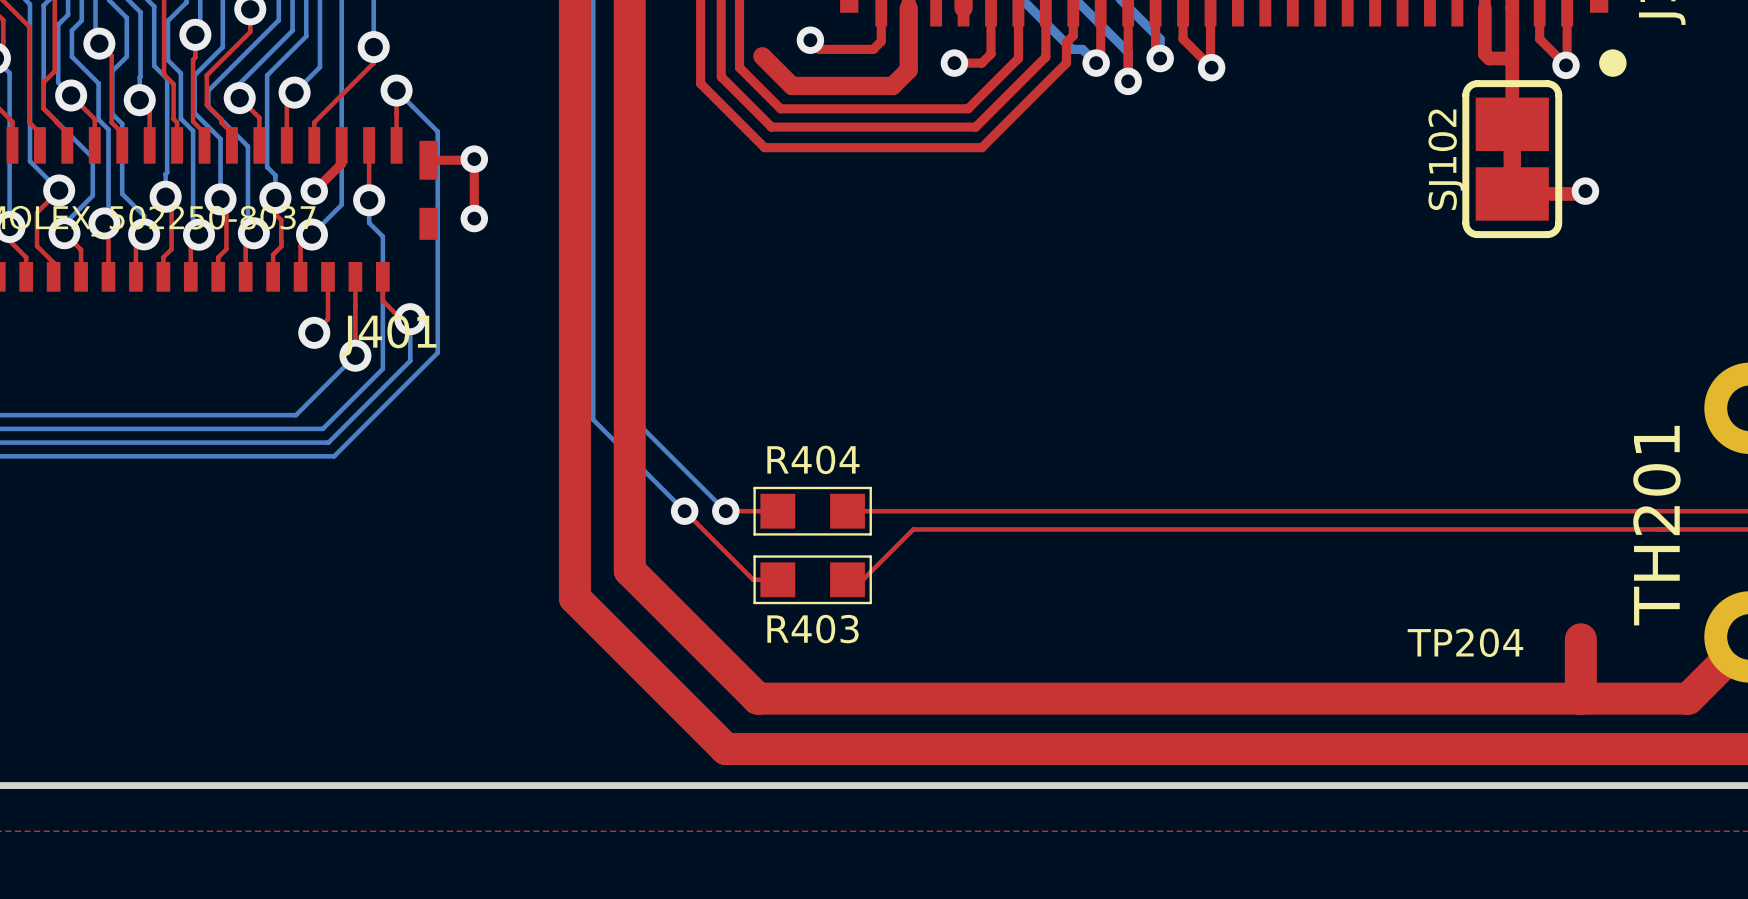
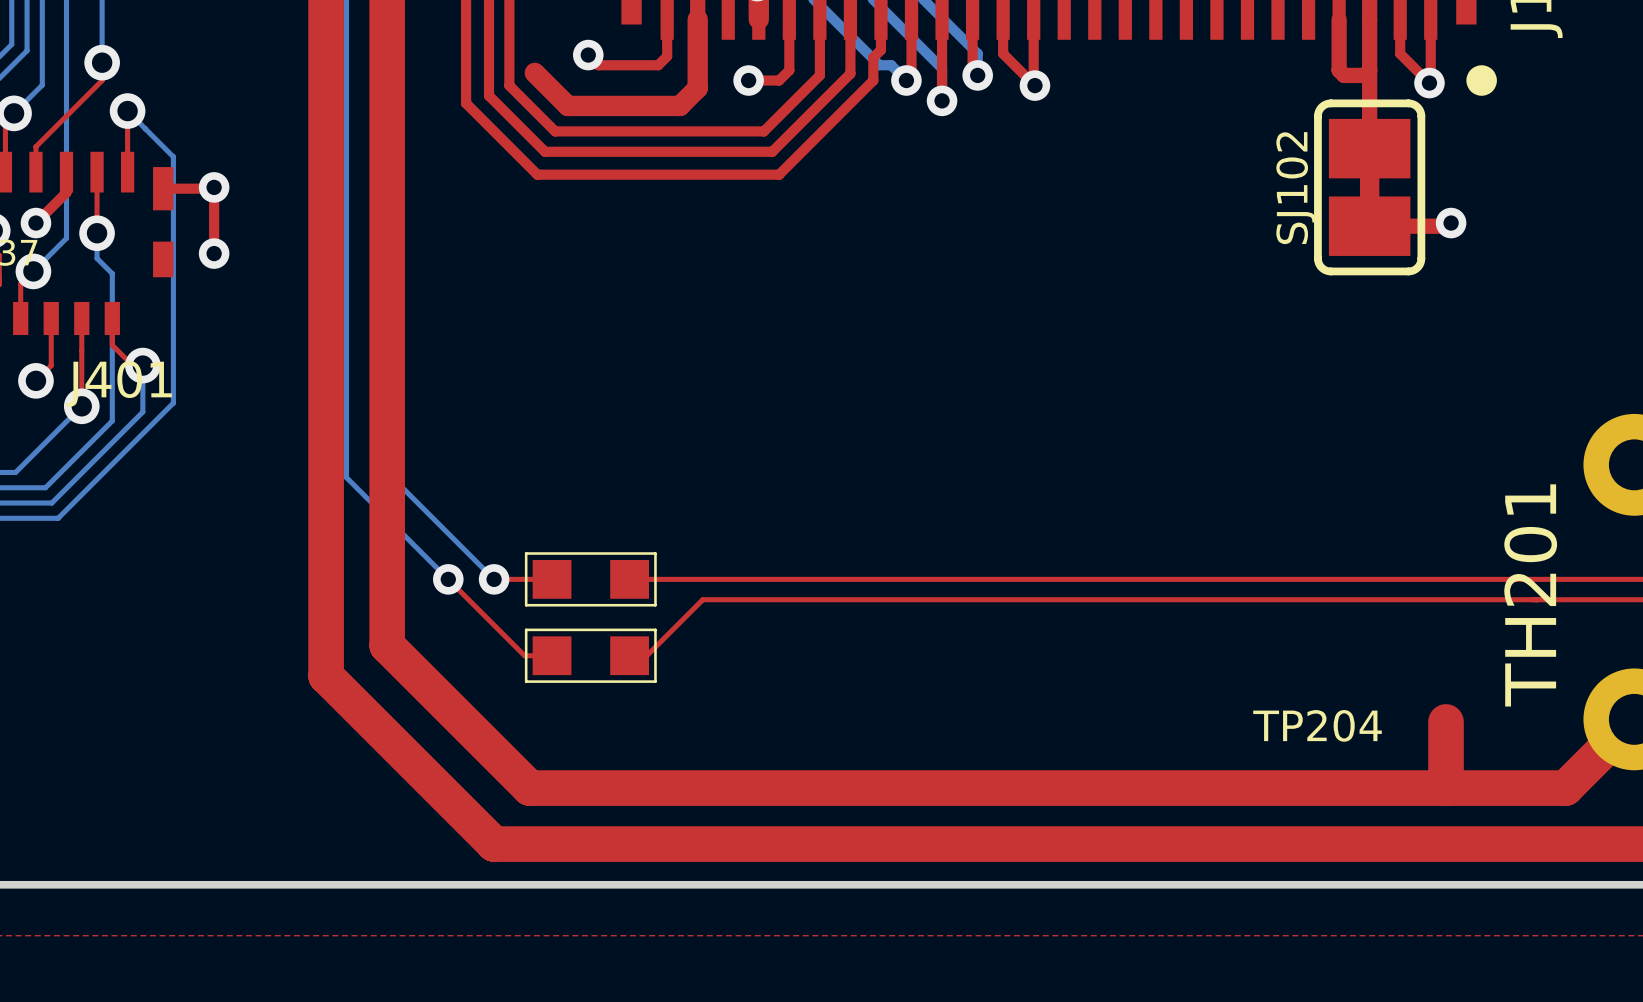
R404 name: R404 (813, 459) -> none
R403 name: R403 (813, 629) -> none

